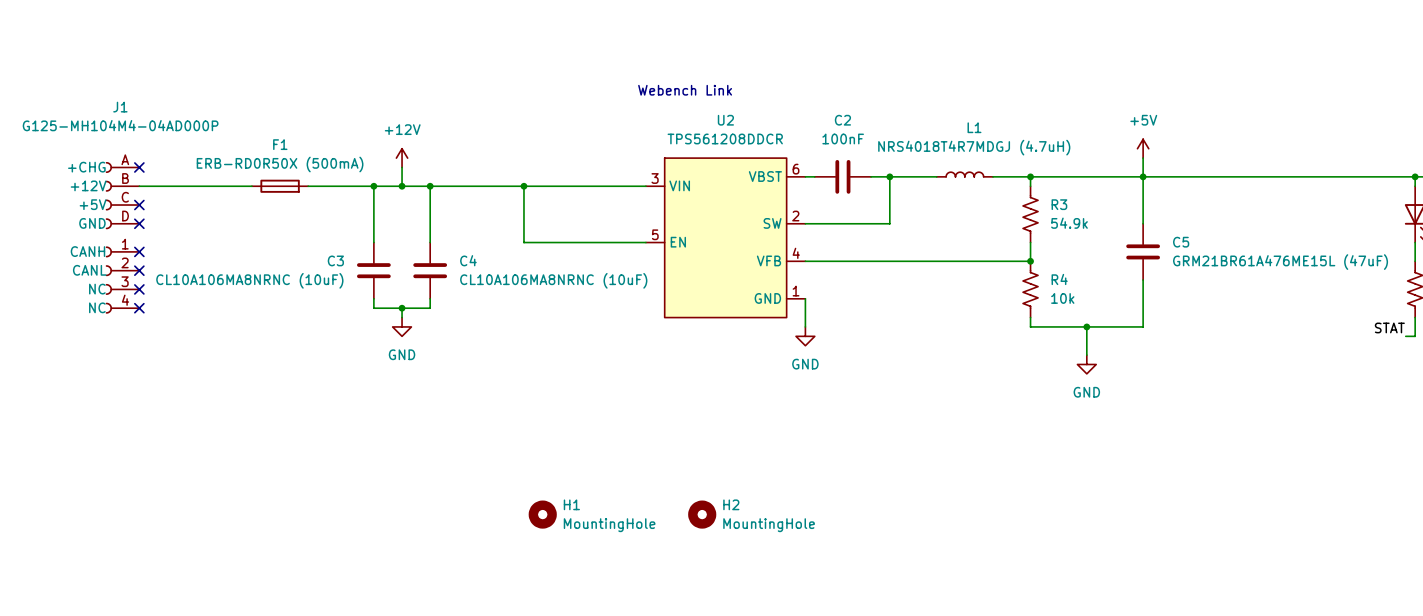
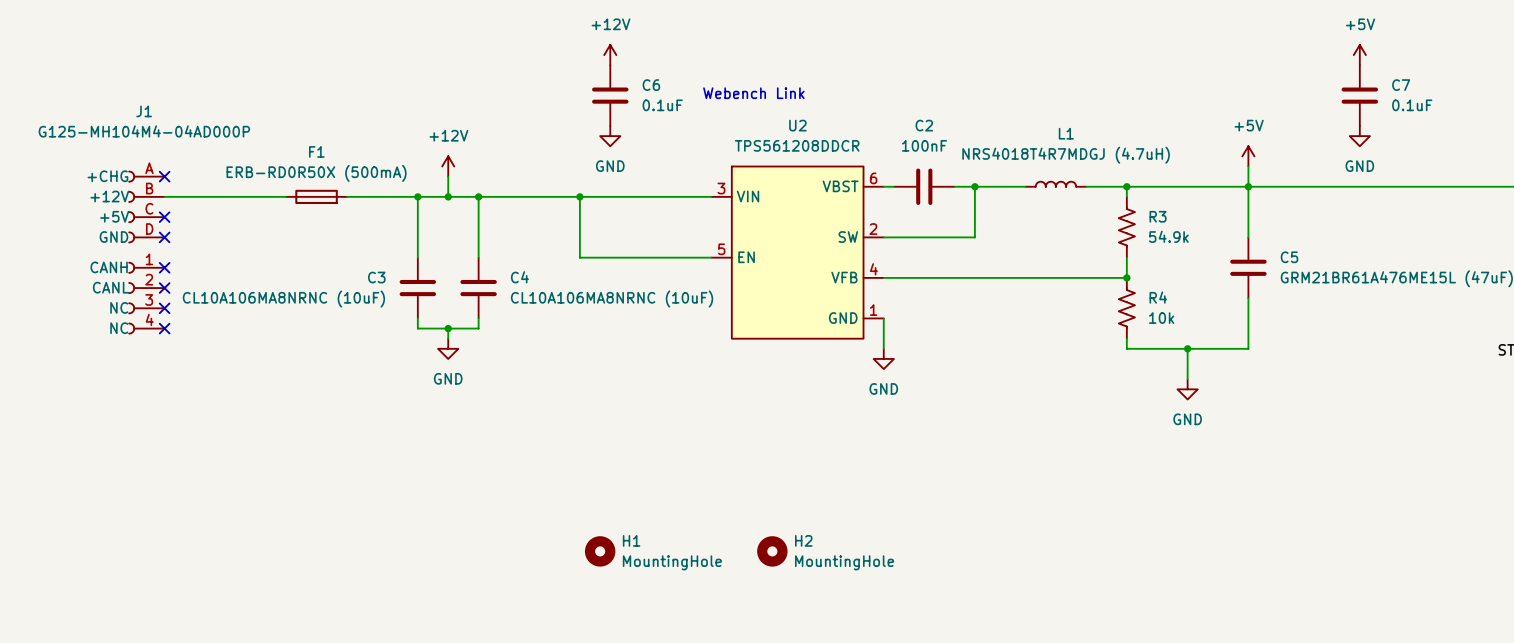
power symbol: none -> +12V (610, 55)
power symbol: none -> +5V (1359, 55)
C6: none -> 0.1uF (610, 95)
C7: none -> 0.1uF (1359, 95)
power symbol: none -> GND (610, 136)
power symbol: none -> GND (1359, 136)

